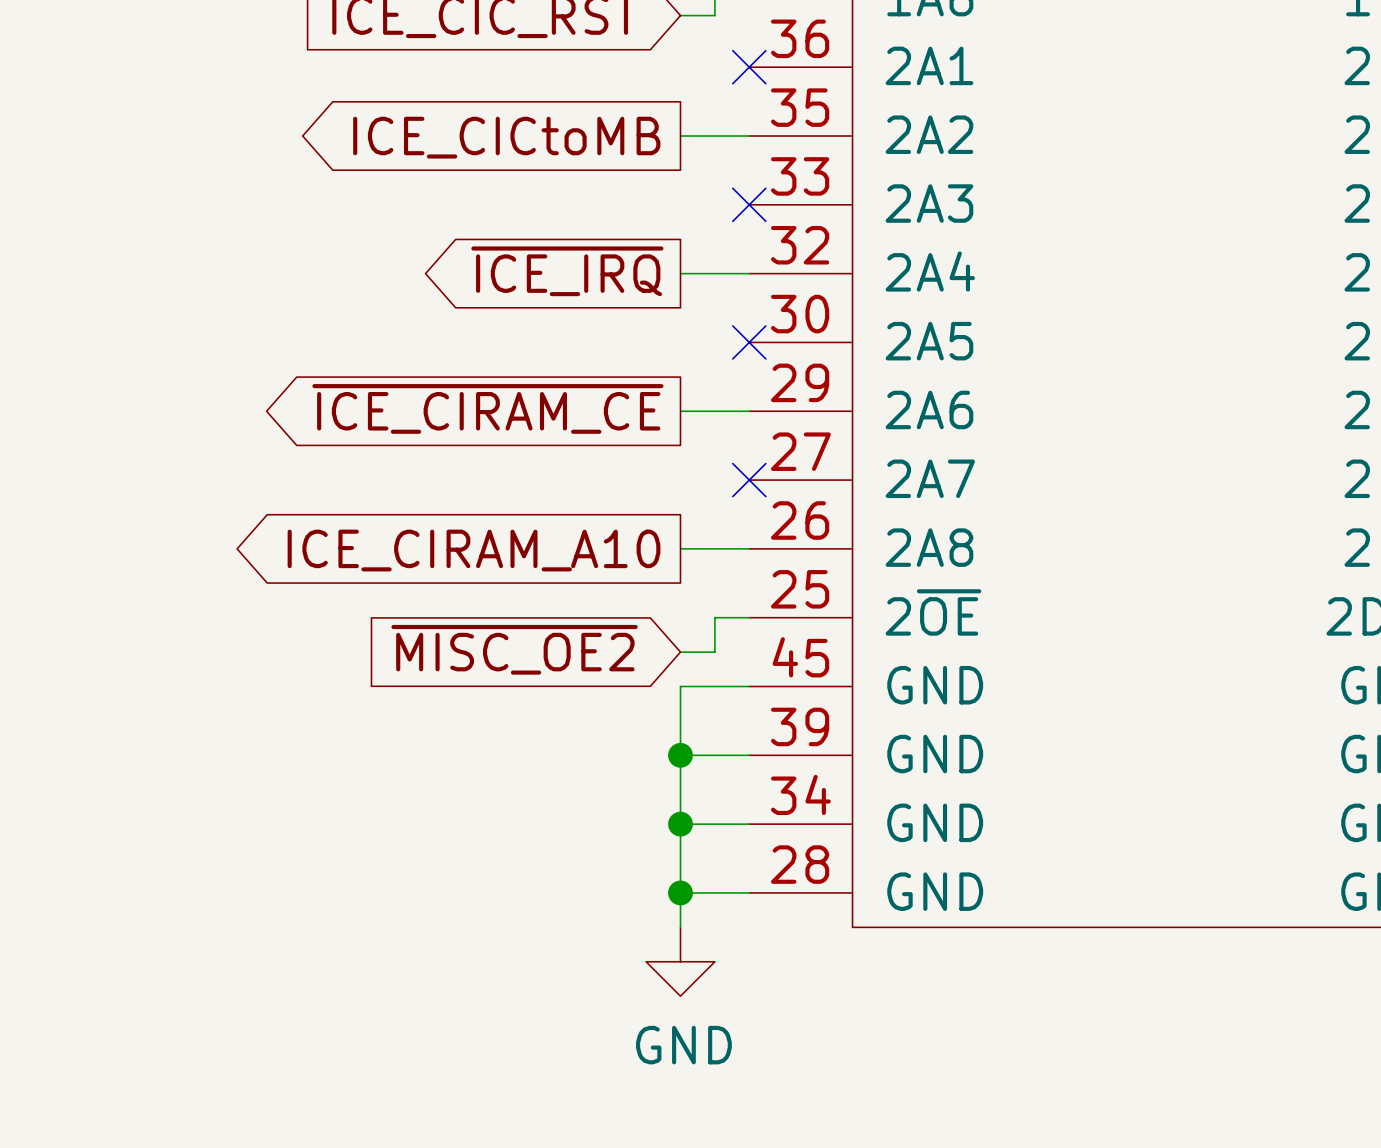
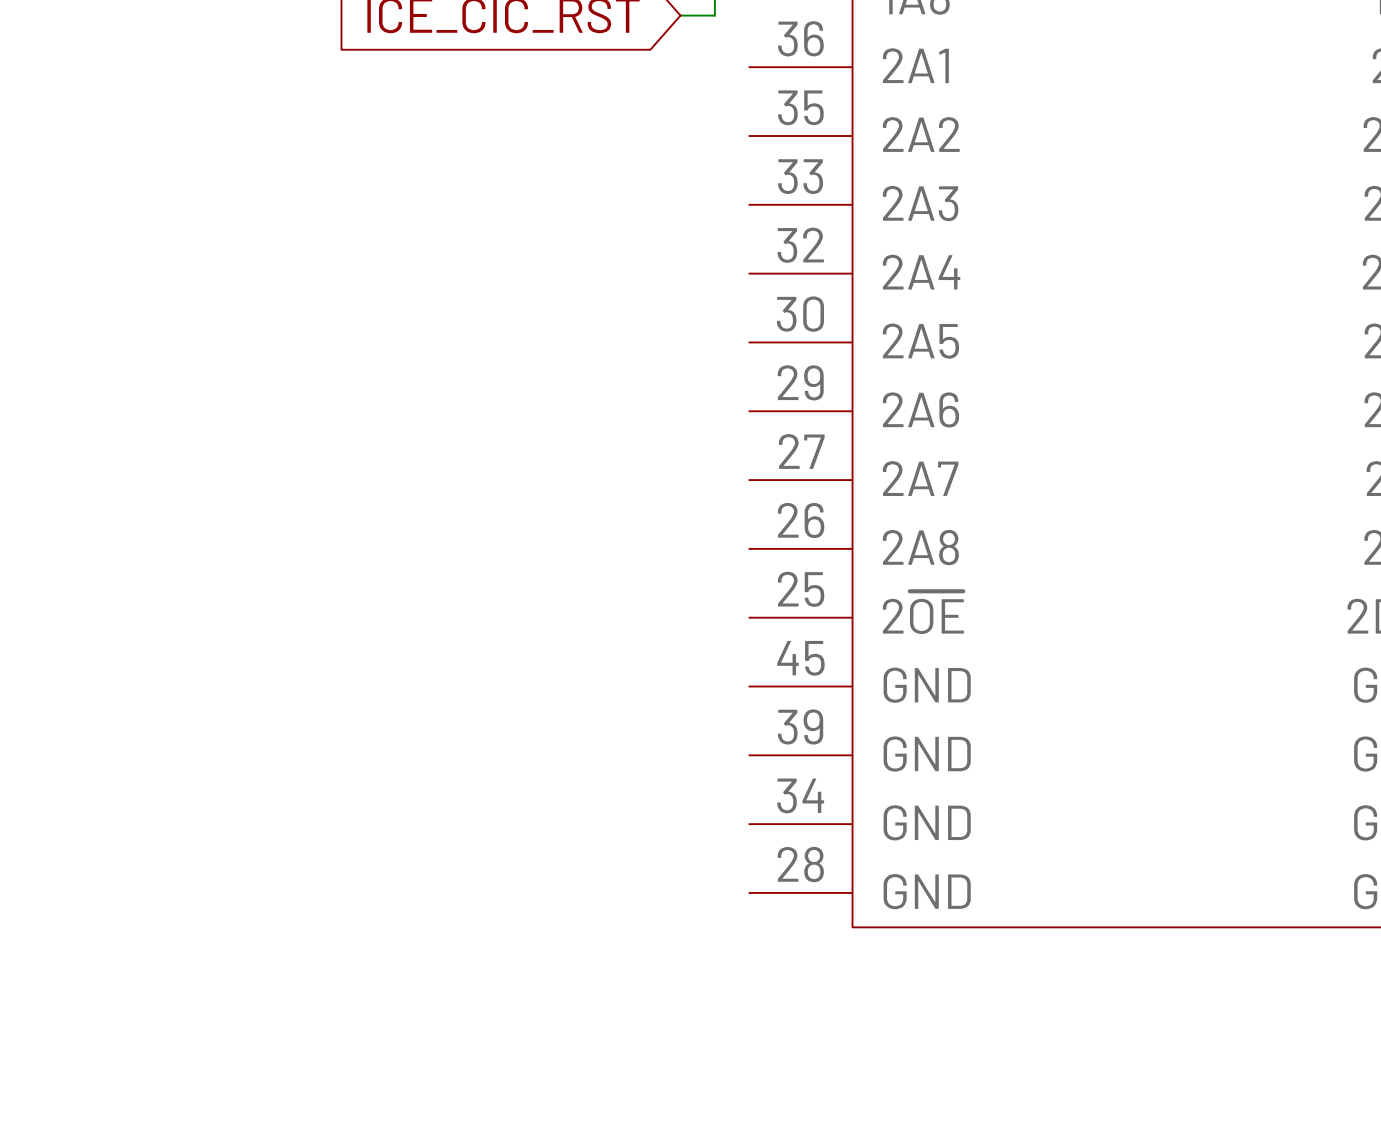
no-connect mark: (749, 67) -> none
wire: (680, 136) (749, 136) -> none
global label: ICE_CICtoMB (506, 137) -> none
no-connect mark: (749, 204) -> none
global label: ~{ICE_IRQ} (567, 271) -> none
wire: (680, 273) (749, 273) -> none
no-connect mark: (749, 342) -> none
global label: ~{ICE_CIRAM_CE} (487, 408) -> none
wire: (680, 411) (749, 411) -> none
no-connect mark: (749, 480) -> none
wire: (680, 548) (749, 548) -> none
global label: ICE_CIRAM_A10 (474, 550) -> none
wire: (749, 617) (714, 617) (714, 652) (680, 652) -> none
global label: ~{MISC_OE2} (514, 649) -> none
wire: (749, 686) (680, 686) (680, 927) -> none
wire: (680, 755) (749, 755) -> none
junction: (680, 755) -> none
wire: (680, 824) (749, 824) -> none
junction: (680, 824) -> none
wire: (680, 892) (749, 892) -> none
junction: (680, 892) -> none
power symbol: GND (680, 961) -> none

